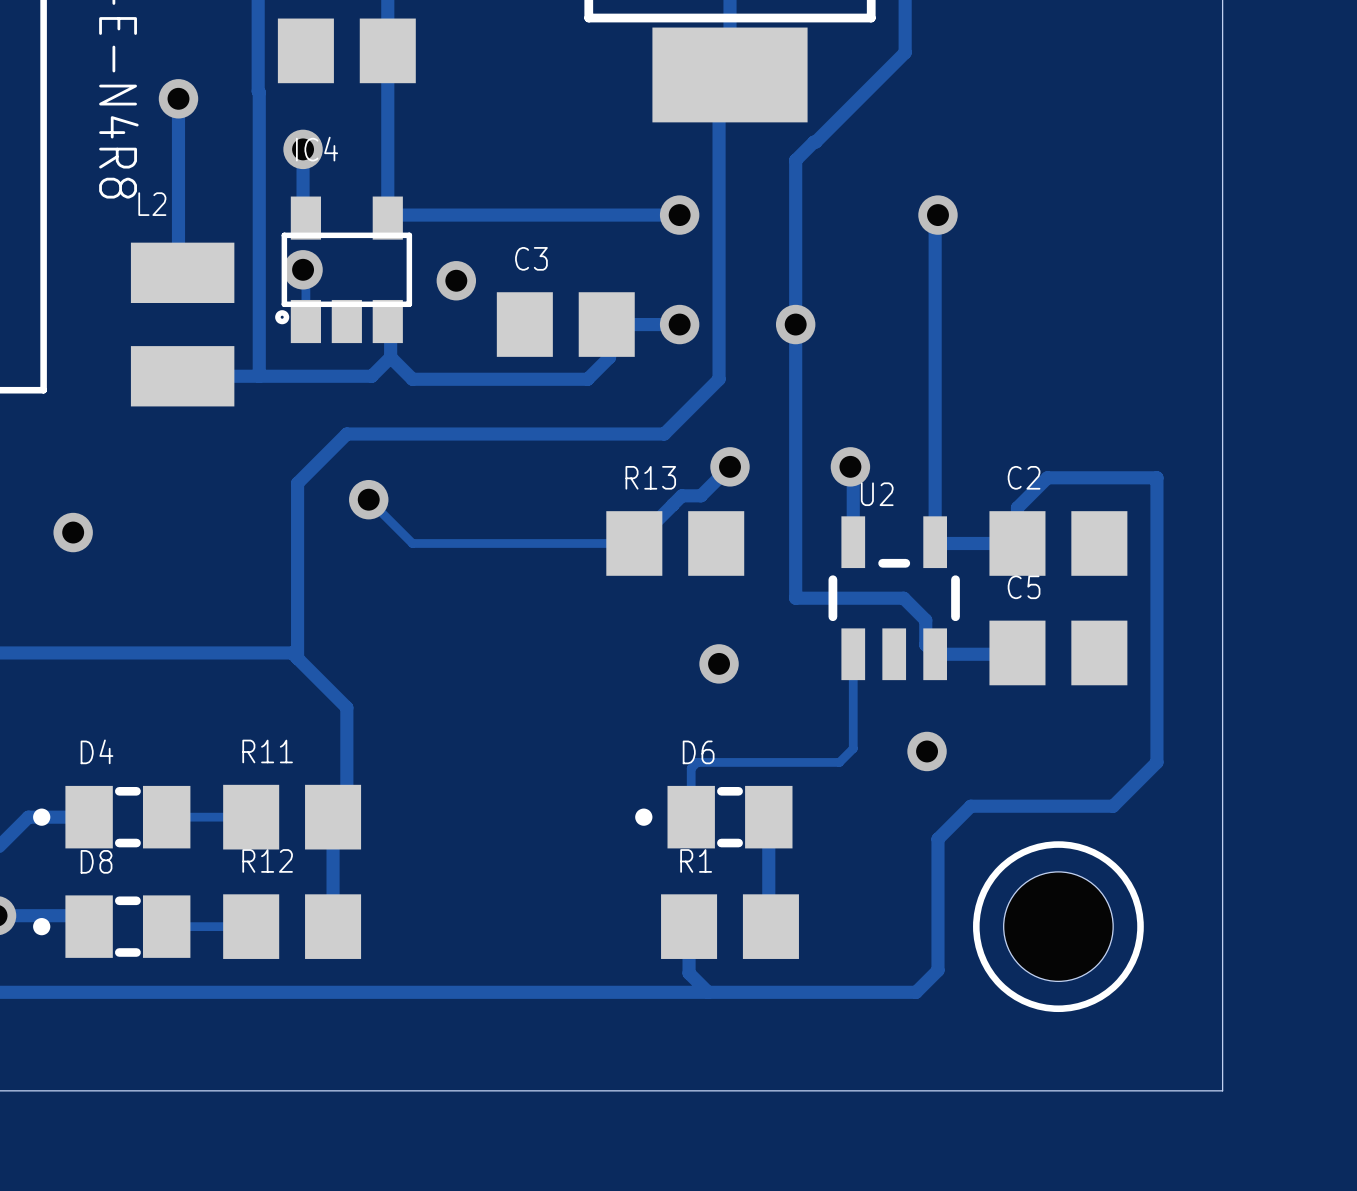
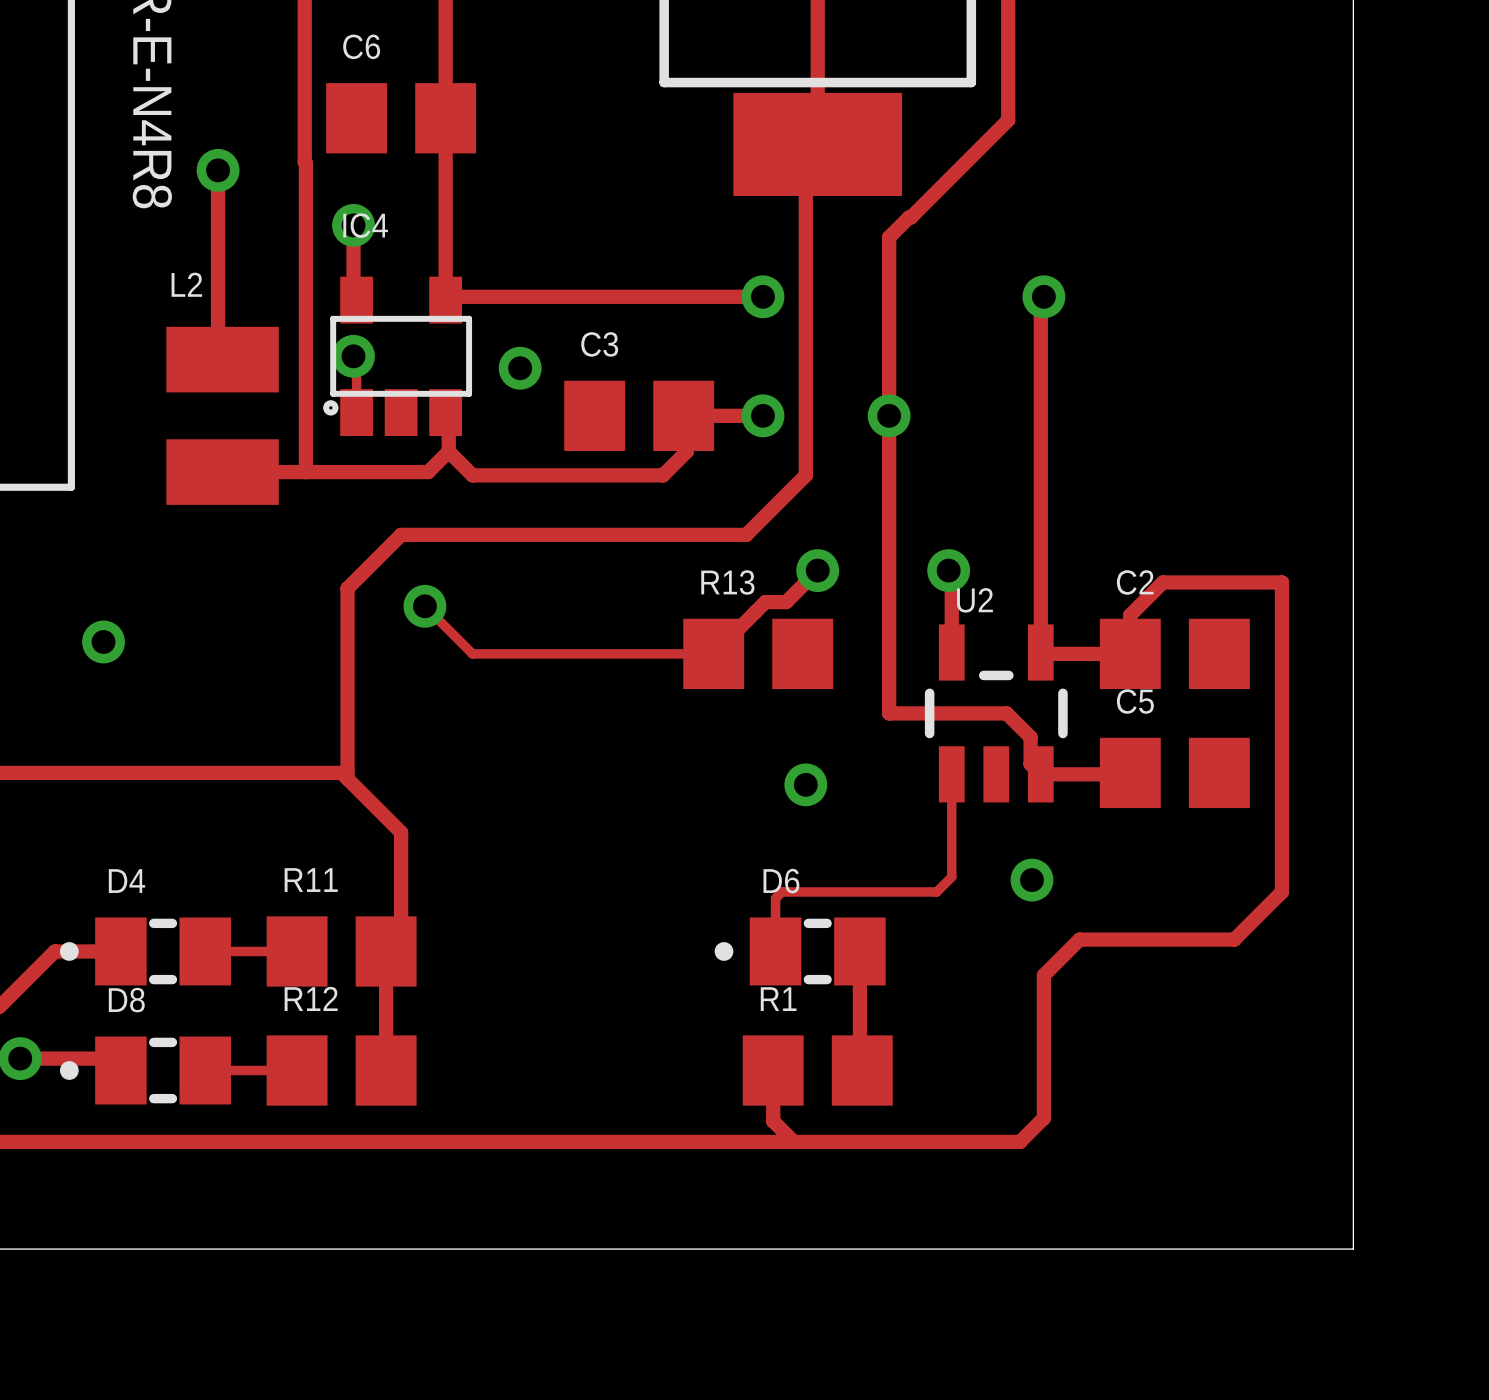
drawing: [973, 841, 1144, 1013] -> none
hole: (1058, 926) -> none

